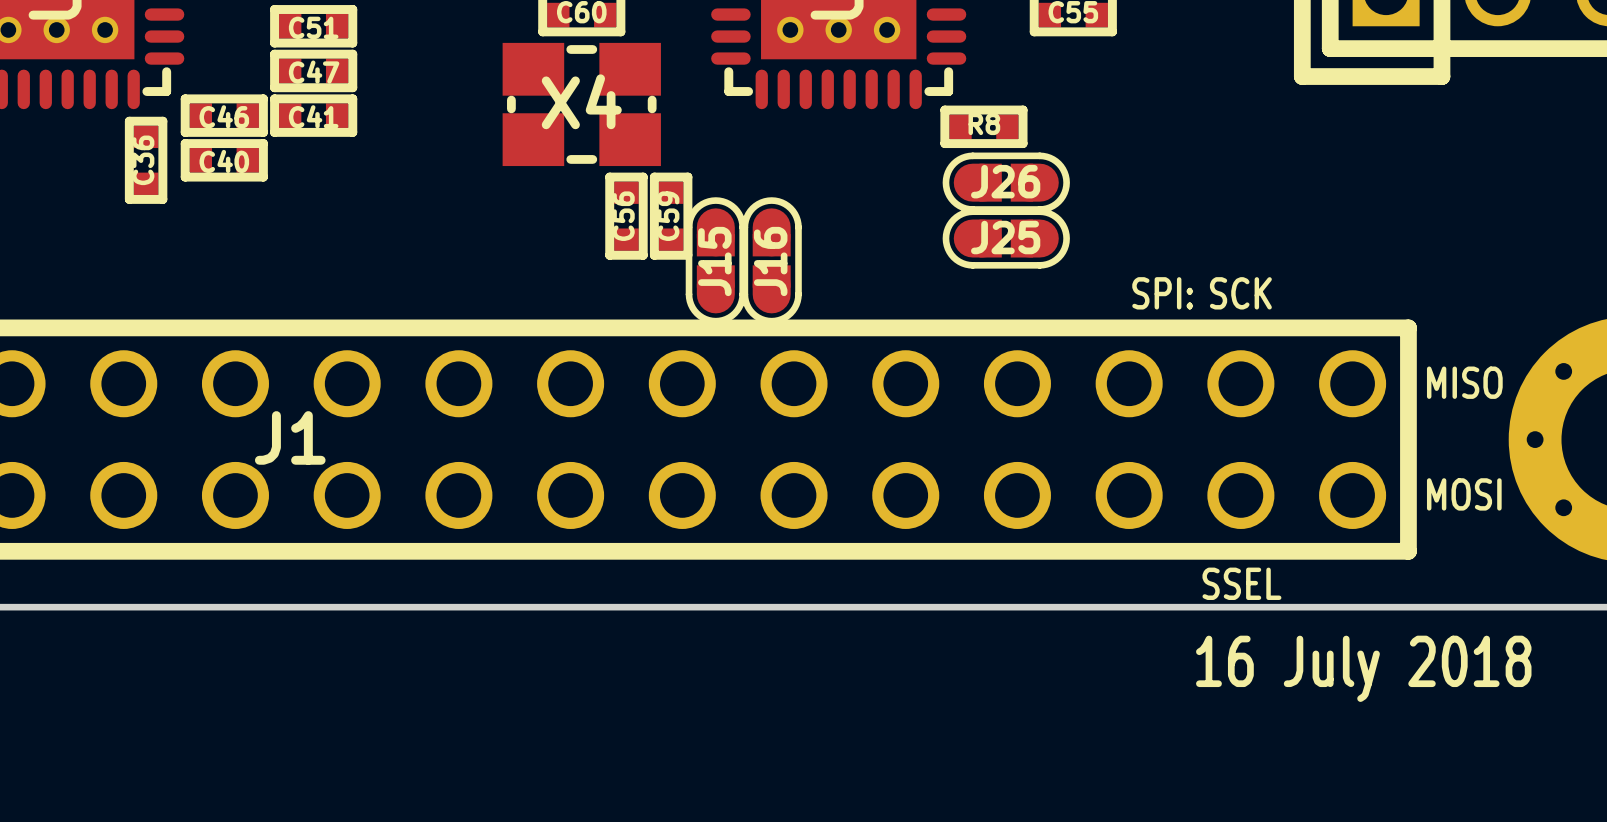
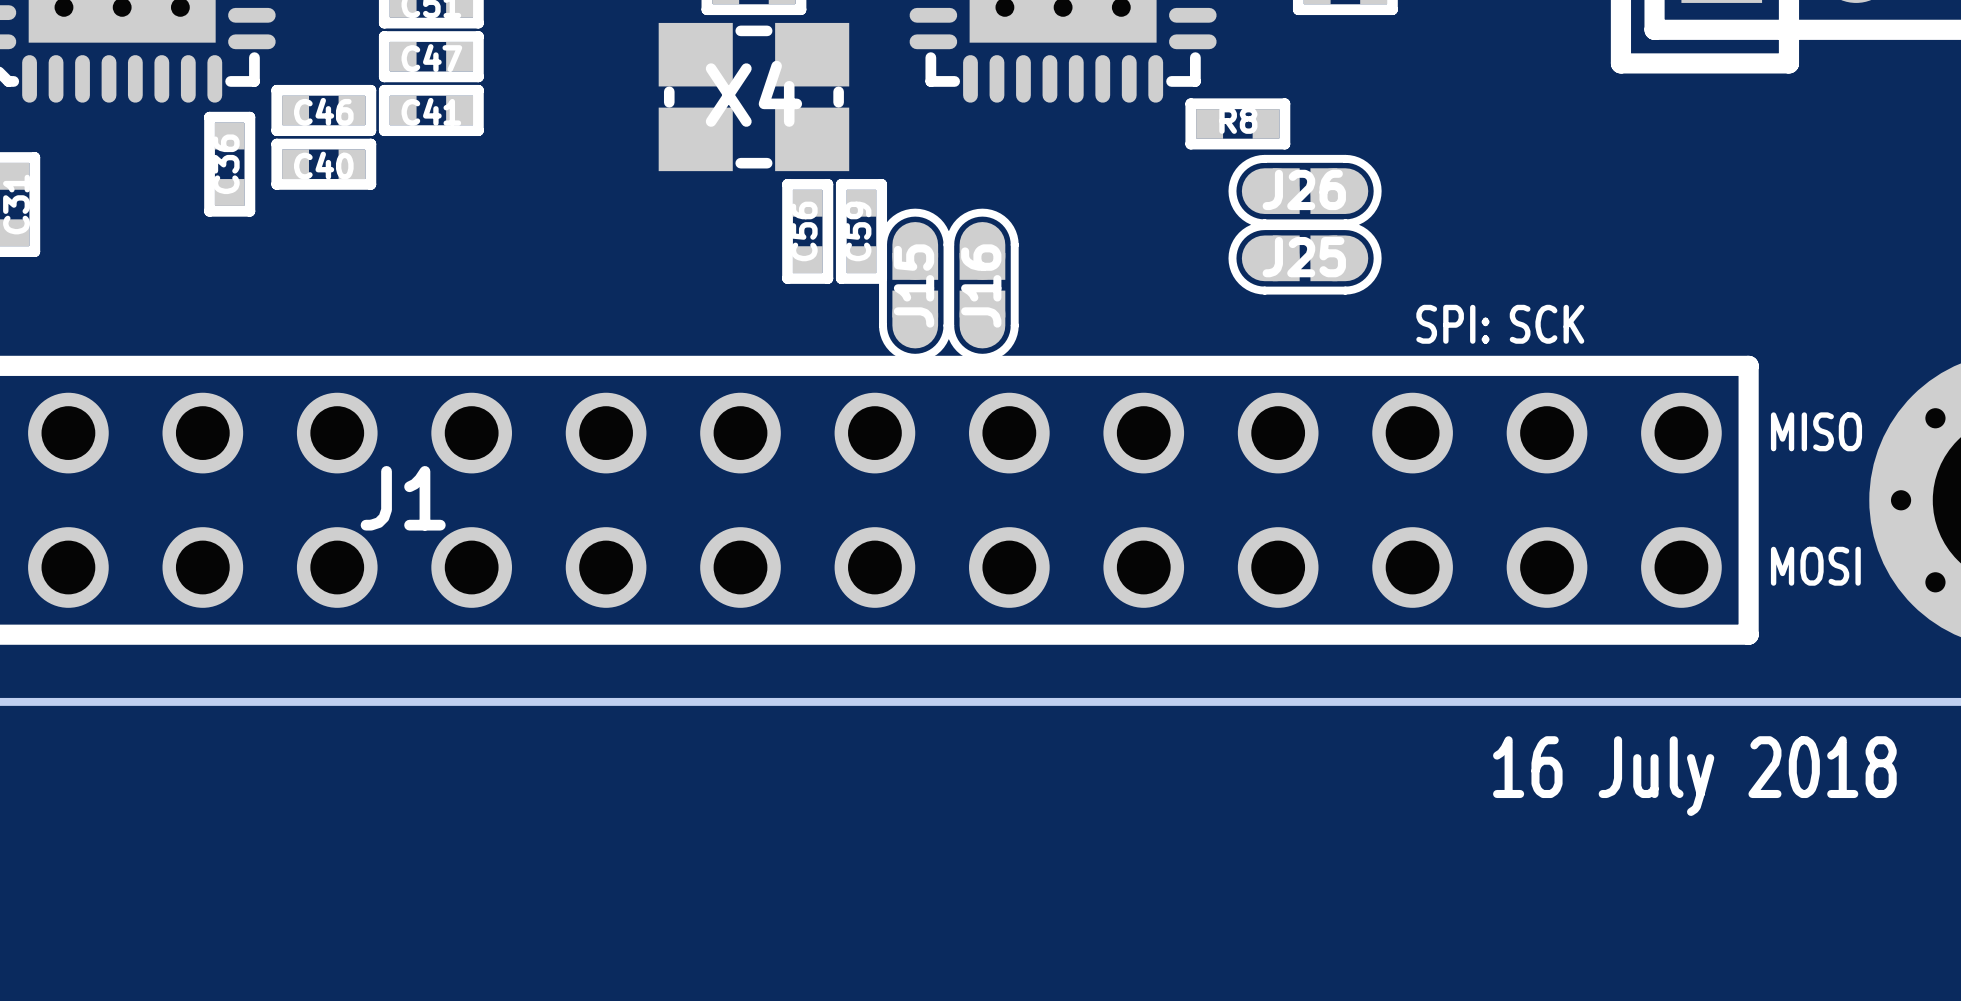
J26 position: (1006, 182) -> (1305, 191)
J25 position: (1006, 238) -> (1305, 258)
text: SSEL (1241, 583) -> none

